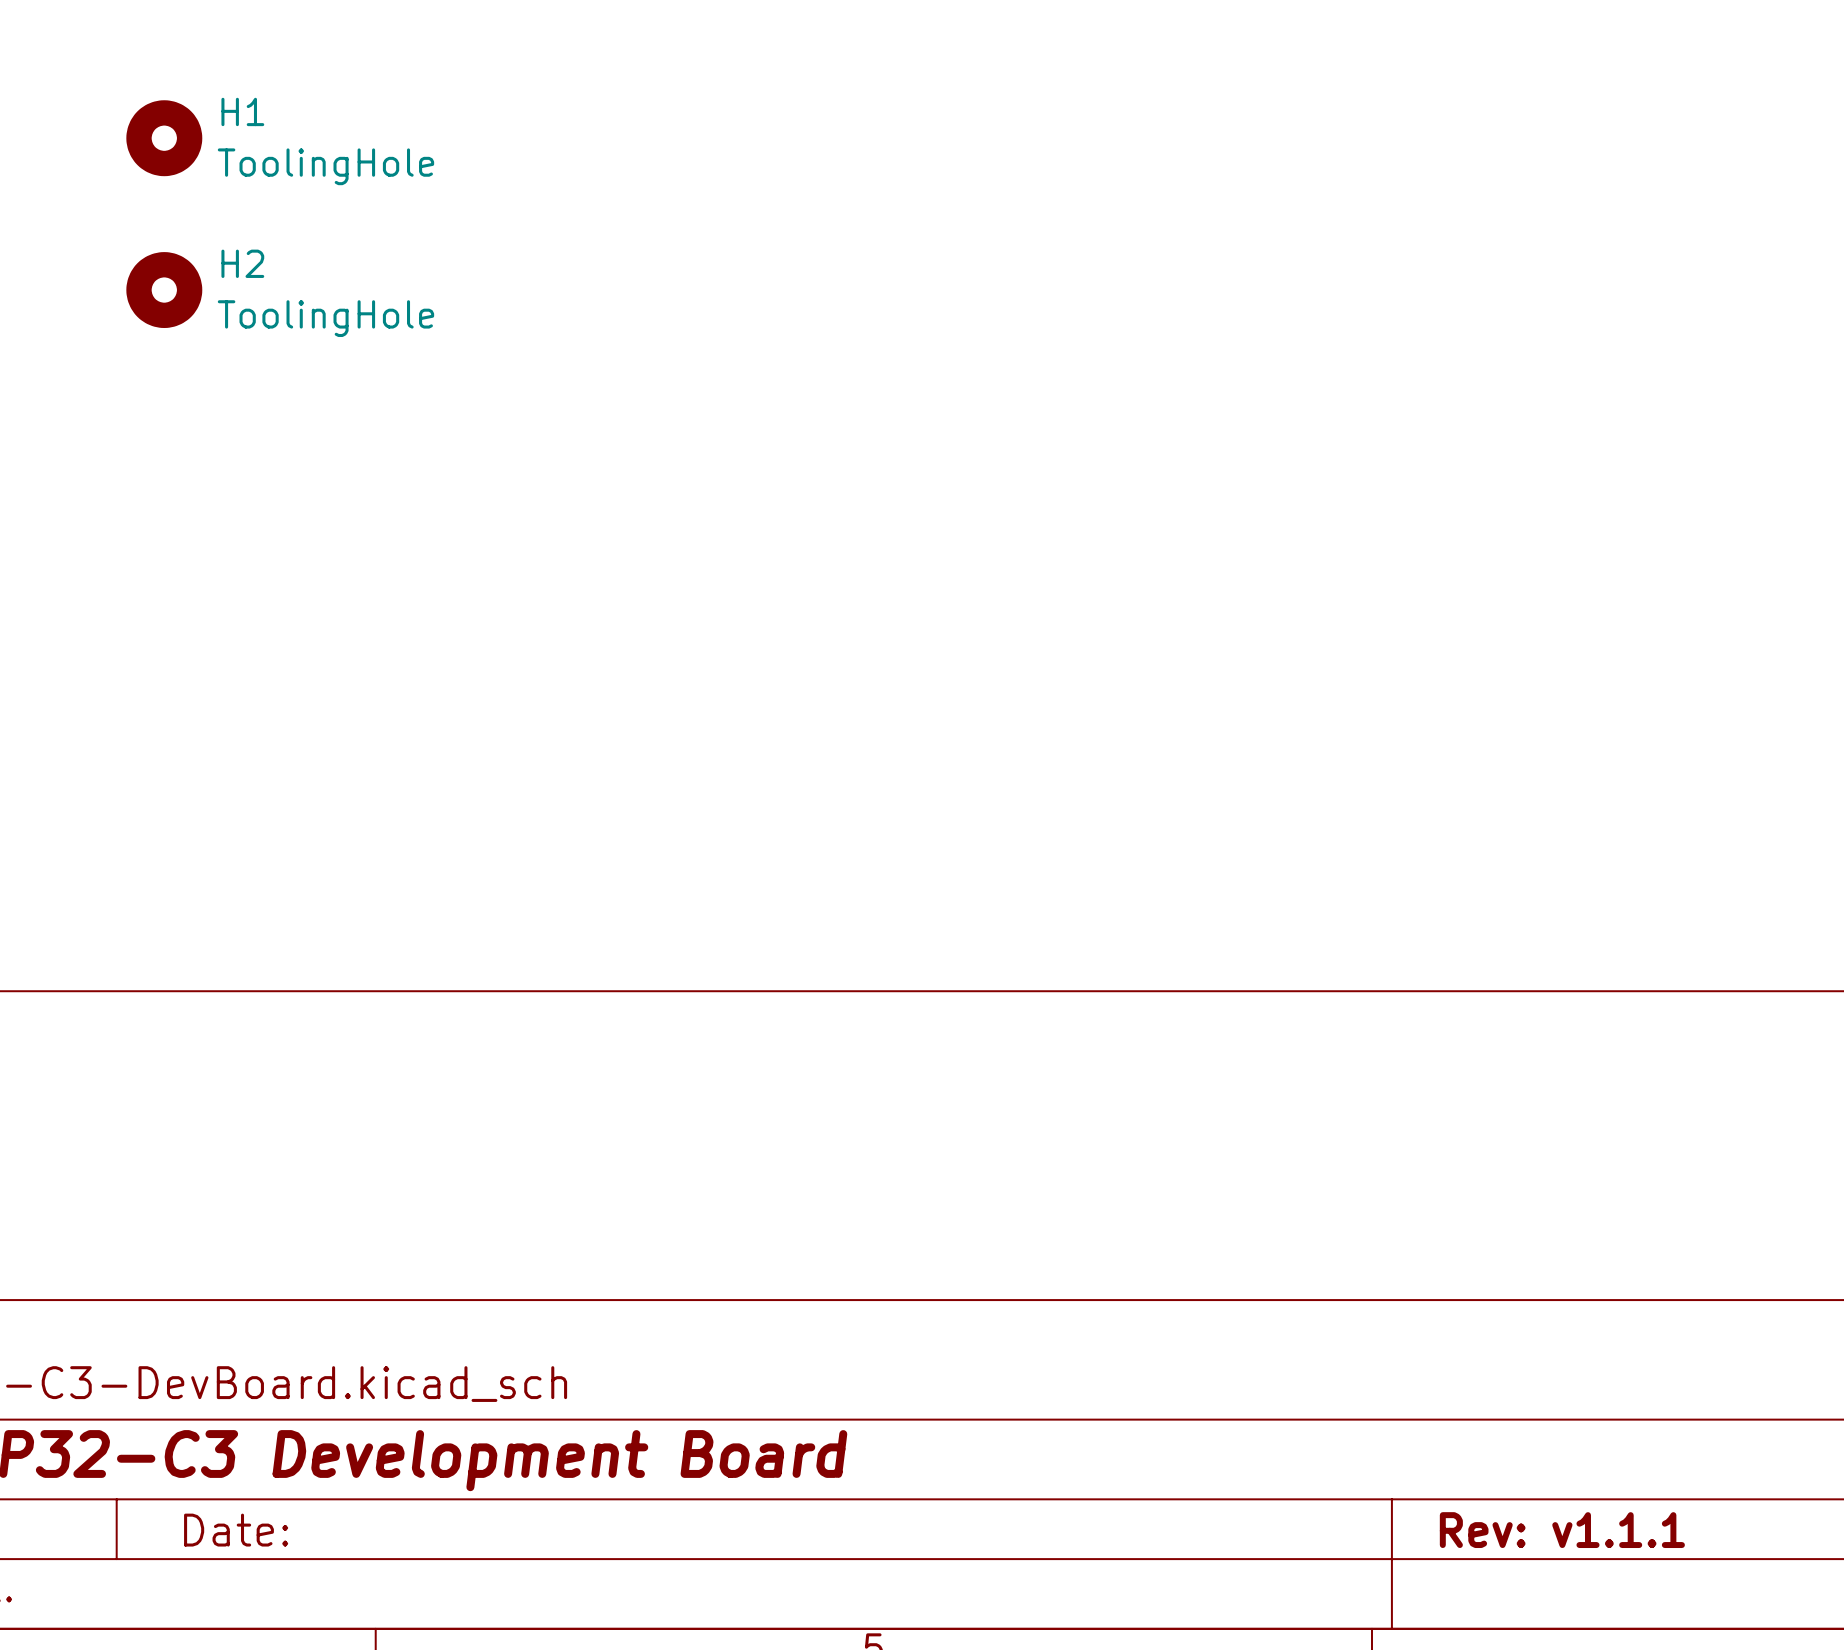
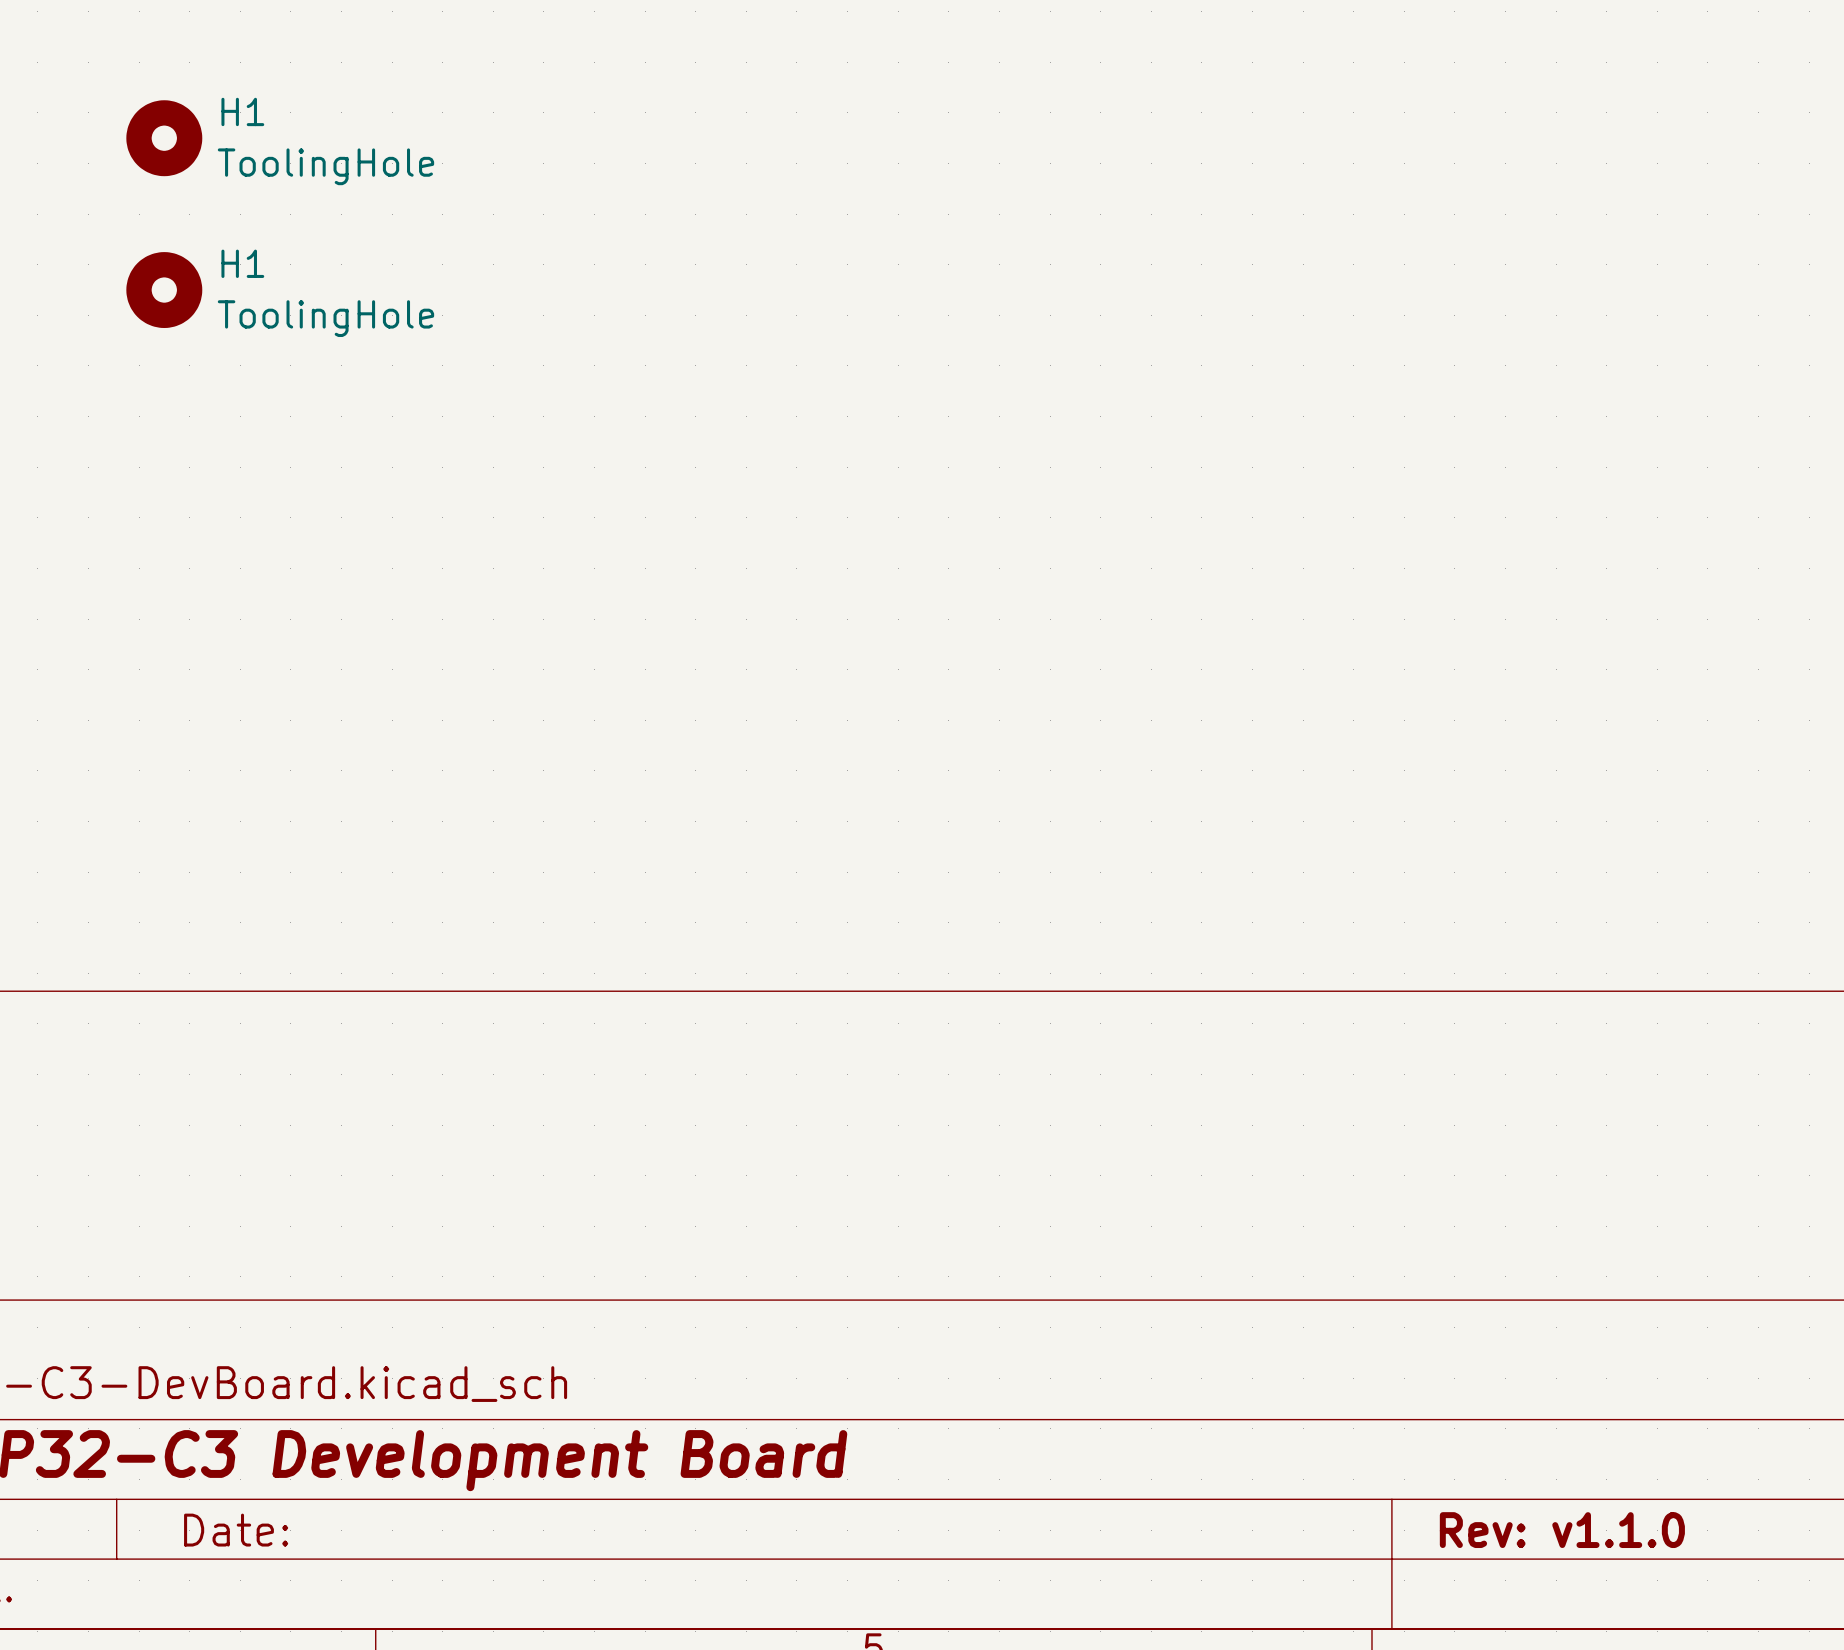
H2 name: H2 (242, 263) -> H1 (242, 263)
title block: Rev: v1.1.1 (1562, 1530) -> Rev: v1.1.0 (1562, 1530)

